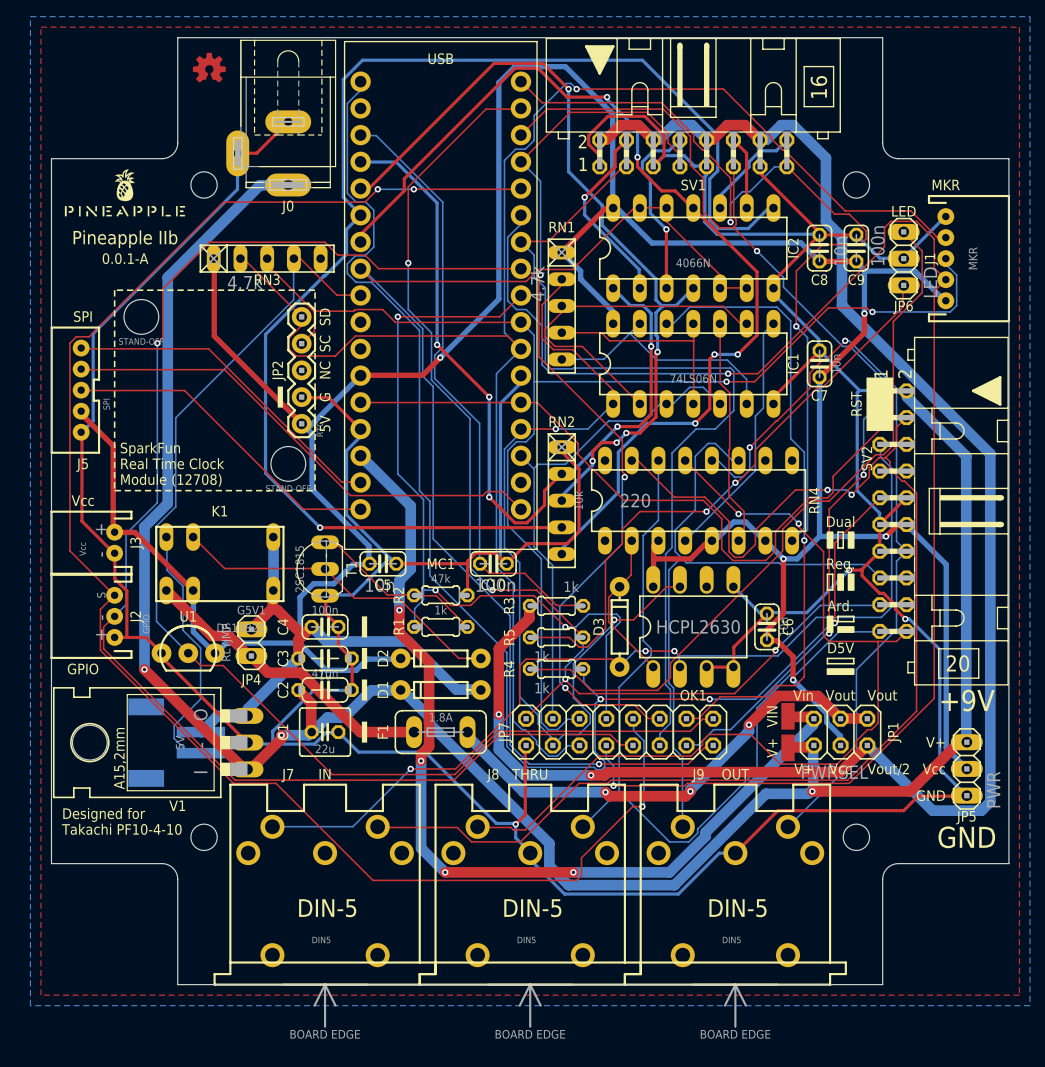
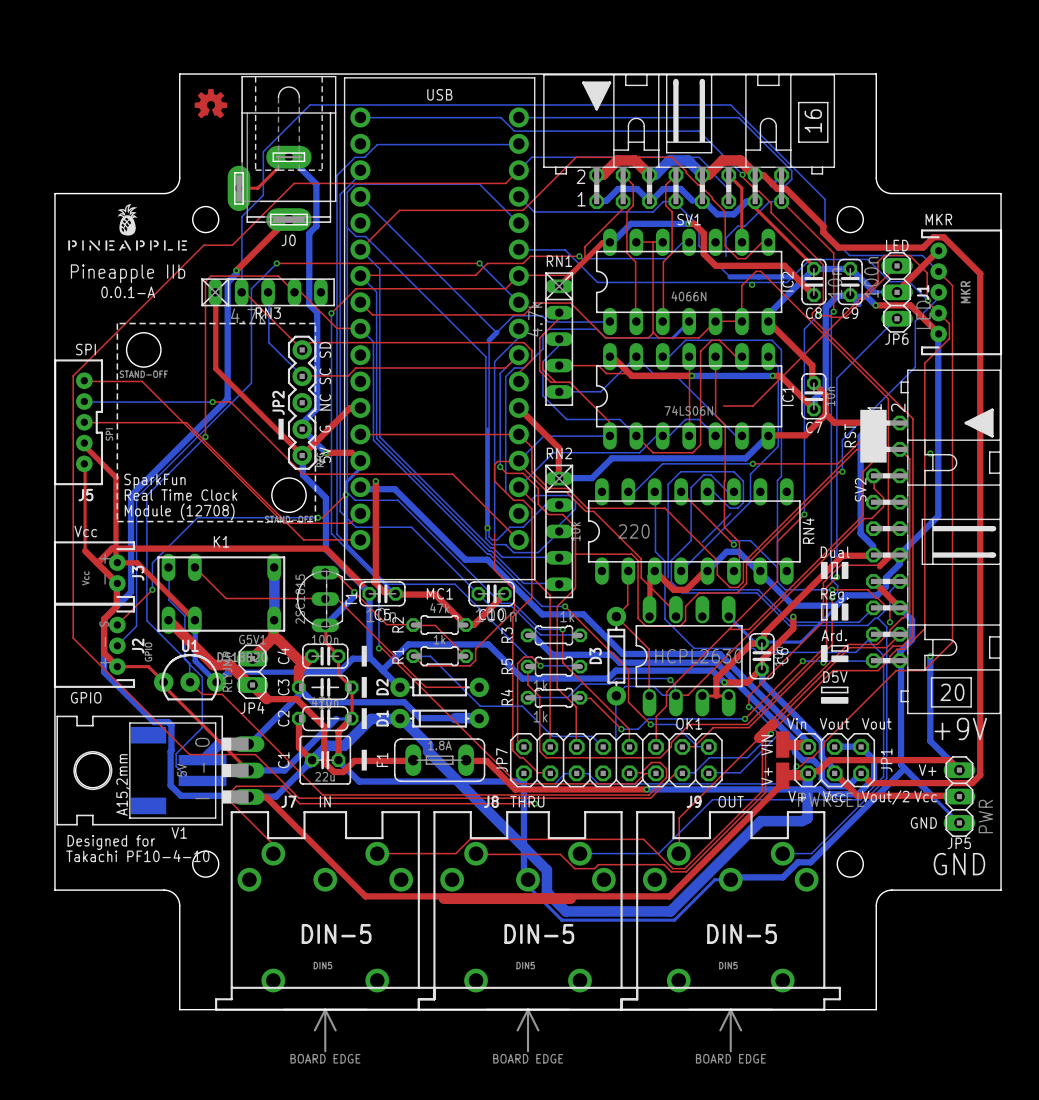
bottom zone outline: (30, 16) (30, 1005) (1029, 1005) (1029, 16) (30, 16) -> none
top zone outline: (40, 27) (40, 995) (1019, 995) (1019, 27) (40, 27) -> none
bottom track: (360, 81) (360, 90) (347, 103) (347, 157) -> (518, 223) (479, 184) (355, 184) (347, 192)
bottom track: none -> (360, 117) (500, 117) (514, 131) (699, 131) (742, 174)
top track: (520, 81) (542, 102) (661, 102) (693, 134) (693, 141) -> none
bottom track: none -> (518, 117) (738, 117) (791, 170) (791, 179) (782, 188) (781, 201)
top track: (568, 89) (542, 63) (494, 63) (368, 188) (360, 188) -> none
bottom track: (568, 89) (568, 171) (602, 205) (602, 225) (656, 279) (656, 299) (662, 306) -> none
via: (568, 89) -> none
top track: (576, 89) (723, 89) (845, 210) (910, 210) (937, 237) (945, 237) -> (796, 766) (800, 766) (809, 757) (812, 757) (824, 745) (824, 742) (896, 670) (924, 670) (952, 642) (952, 285) (938, 271)
bottom track: (576, 89) (571, 83) (566, 83) (534, 115) (534, 140) (525, 149) (515, 149) (504, 160) (504, 332) (520, 348) (496, 373) -> (518, 328) (518, 337) (494, 361) (494, 406)
via: (576, 89) -> none
top track: (607, 97) (567, 97) (538, 68) (514, 68) (404, 178) (404, 190) (360, 234) (360, 241) -> (579, 256) (530, 256) (523, 263) (487, 263) (475, 275) (360, 275)
bottom track: (607, 97) (607, 99) (637, 129) (637, 157) -> none
via: (607, 97) -> none
top track: (520, 108) (486, 109) (408, 186) (408, 263) -> none
bottom track: none -> (288, 157) (316, 184) (316, 226) (309, 233) (309, 304) (317, 312) (317, 408) (303, 421) (302, 429) (325, 452)
top track: (676, 121) (663, 109) (546, 109) (520, 135) -> (672, 157) (576, 157) (523, 210) (399, 210) (360, 249)
bottom track: (360, 135) (376, 135) (442, 202) (442, 347) (434, 355) (434, 378) (479, 423) (479, 563) -> (360, 170) (359, 174) (340, 194) (340, 511) (356, 527) (411, 527) (478, 593)
bottom track: none -> (518, 170) (531, 157) (699, 157) (728, 188) (728, 201)
top track: (690, 137) (690, 165) (703, 178) (703, 211) (719, 227) (732, 227) (736, 224) (736, 219) (733, 217) (733, 166) -> (686, 173) (689, 176)
top track: none -> (742, 174) (742, 177) (756, 191) (759, 191) (771, 203) (771, 212) (823, 265) (823, 302) (812, 313) (812, 318) (912, 418) (912, 635) (902, 646) (893, 646) (878, 660) (873, 660)
via: none -> (742, 174)
top track: (626, 140) (615, 151) (615, 166) (584, 197) -> (623, 175) (633, 185) (633, 205) (626, 211) (626, 253) (635, 261) (636, 321)
bottom track: (679, 140) (668, 150) (653, 150) (642, 162) (642, 171) (650, 179) (650, 213) (666, 229) -> none
bottom track: (760, 140) (766, 139) (781, 125) (793, 125) (825, 158) (825, 221) (842, 237) (842, 305) (990, 453) (990, 801) (981, 810) (932, 810) (867, 745) -> (527, 635) (533, 635) (552, 654) (611, 654) (619, 662) (716, 662) (794, 741) (794, 752) (802, 760) (813, 760) (821, 768) (821, 779) (828, 786) (847, 786) (861, 773)
bottom track: (776, 150) (760, 150) (749, 162) (749, 166) (720, 195) (720, 207) -> none
bottom track: (237, 153) (237, 189) (93, 333) (93, 420) (81, 432) -> none
top track: (637, 157) (637, 166) (661, 190) (675, 190) (757, 271) (757, 335) (737, 354) -> none
via: (637, 157) -> none
top track: (520, 161) (570, 112) (647, 112) (668, 133) (668, 142) (679, 154) (679, 166) -> none
bottom track: (360, 162) (396, 162) (437, 202) (437, 344) -> (360, 196) (496, 332)
top track: (599, 166) (599, 154) (588, 144) (588, 135) (607, 116) (644, 116) (664, 135) (664, 155) (653, 166) -> none
top track: (626, 166) (623, 166) (548, 241) -> (622, 201) (622, 208) (584, 246) (584, 258) (568, 275) (546, 275)
bottom track: (696, 166) (694, 166) (684, 155) (664, 155) (653, 166) -> (692, 200) (680, 188) (663, 188) (649, 201) (637, 188) (618, 188) (606, 200) (596, 201)
bottom track: (706, 166) (704, 222) (716, 234) (819, 234) -> (702, 201) (717, 214) (733, 214) (746, 201) (755, 201)
bottom track: (536, 177) (540, 181) (540, 275) -> none
top track: (729, 177) (730, 222) -> (725, 211) (725, 246) (737, 258) (745, 258) (761, 242) (768, 242)
top track: none -> (288, 219) (236, 270)
bottom track: (288, 184) (259, 185) (167, 277) (167, 503) (144, 526) -> (205, 436) (146, 495) (146, 557)
top track: (520, 188) (413, 189) -> none
top track: (377, 189) (364, 202) (223, 202) (89, 336) (76, 336) -> (518, 170) (505, 183) (294, 183) (232, 245) (203, 245) (79, 369)
bottom track: (377, 189) (413, 189) -> none
via: (377, 189) -> none
via: (413, 189) -> none
bottom track: none -> (688, 223) (630, 223) (612, 242) (609, 242)
via: none -> (688, 223)
bottom track: (584, 197) (584, 214) (639, 269) (639, 288) -> none
via position: (584, 197) -> (579, 256)
top track: (639, 208) (633, 208) (572, 269) -> (653, 332) (648, 337) (605, 337) (569, 303)
top track: (666, 208) (667, 222) (720, 275) (720, 288) -> (653, 242) (653, 332) (658, 337) (699, 337) (715, 321)
bottom track: none -> (689, 242) (682, 242) (666, 258) (581, 258) (579, 256)
bottom track: (773, 208) (768, 208) (748, 228) (718, 228) (709, 219) (709, 178) (717, 170) (717, 135) (642, 60) (362, 60) (343, 79) (343, 197) (360, 215) (346, 229) (346, 254) (265, 334) (265, 473) (320, 527) -> none
bottom track: (373, 210) (373, 247) (364, 255) (355, 255) (347, 263) -> (347, 227) (347, 297)
bottom track: none -> (373, 244) (485, 356) (485, 538) (492, 544) (505, 544) (513, 552) (538, 552) (559, 531)
top track: (834, 214) (849, 214) (866, 230) (866, 239) (860, 244) (822, 244) (796, 271) (796, 326) -> (828, 248) (833, 253) (833, 311)
bottom track: none -> (360, 249) (379, 268) (379, 436) (490, 547) (502, 557) (559, 557)
bottom track: (520, 215) (520, 224) (507, 237) (507, 300) (516, 309) (526, 309) (542, 325) (542, 364) (550, 373) (728, 373) -> (518, 249) (565, 249) (597, 282) (786, 282) (809, 259) (867, 259) (889, 281) (908, 281) (927, 300)
top track: none -> (938, 250) (897, 292)
bottom track: (945, 216) (903, 258) -> none
via: (730, 222) -> none
top track: (733, 227) (757, 251) -> none
top track: none -> (276, 263) (479, 263)
via: none -> (276, 263)
bottom track: none -> (479, 263) (518, 302)
via: none -> (479, 263)
top track: (666, 229) (666, 288) -> (675, 175) (665, 185) (665, 205) (672, 211) (672, 253) (663, 261) (662, 321)
via: (666, 229) -> none
top track: (903, 231) (922, 251) (922, 292) (893, 321) (893, 445) (883, 454) (875, 454) (829, 501) (810, 501) (782, 529) -> (897, 265) (845, 317) (817, 315)
top track: (856, 234) (819, 234) (773, 280) (773, 288) -> (825, 414) (825, 394) (812, 380) (812, 365) (768, 321)
bottom track: (856, 234) (880, 258) -> (768, 321) (768, 314) (813, 268) (850, 268) (874, 291)
via: none -> (236, 270)
bottom track: none -> (938, 271) (922, 255) (849, 255) (824, 230) (824, 199) (730, 104) (310, 104) (263, 151) (263, 195) (241, 216) (241, 292)
top track: (277, 242) (324, 242) (337, 255) (356, 255) -> (278, 276) (294, 292)
bottom track: (520, 242) (534, 255) (534, 276) (545, 287) (545, 301) -> none
bottom track: (734, 243) (651, 243) (617, 208) (613, 208) (612, 113) (565, 66) (514, 66) (498, 82) (498, 299) -> (729, 276) (699, 246) (699, 226) (675, 201) (663, 201) (653, 211) (534, 211)
top track: (203, 247) (162, 288) (162, 337) (157, 343) -> (205, 281) (205, 436)
bottom track: (757, 251) (783, 277) (783, 287) (842, 346) (850, 346) (890, 386) (890, 395) (863, 419) (863, 474) -> none
bottom track: (561, 252) (580, 271) (580, 279) (612, 311) (613, 323) -> none
top track: none -> (356, 288) (331, 313)
top track: (364, 255) (378, 268) (520, 268) -> (364, 288) (505, 288) (518, 275)
top track: (267, 258) (267, 265) (314, 311) (314, 331) (302, 343) -> none
bottom track: none -> (268, 292) (268, 342) (302, 376)
bottom track: (293, 258) (293, 299) (175, 417) (175, 506) -> (317, 517) (197, 517) (177, 537)
bottom track: (945, 258) (946, 264) (956, 275) (956, 305) (950, 311) (872, 311) -> (938, 292) (938, 298) (915, 321) (915, 367) (842, 440) (842, 471)
top track: (819, 261) (856, 261) -> (813, 295) (784, 265) (715, 265) (703, 253) (703, 233) (694, 223) (688, 223)
bottom track: (408, 263) (408, 309) (431, 332) (431, 380) (469, 418) (469, 567) -> (518, 143) (377, 144) (364, 157) (355, 157) (337, 175) (337, 534) (386, 584) (455, 584) (468, 597)
via: (408, 263) -> none
via: none -> (927, 300)
bottom track: (360, 268) (422, 328) (422, 376) (433, 386) (433, 538) (510, 615) (510, 744) (529, 764) (599, 764) -> none
top track: none -> (875, 305) (910, 305) (938, 333)
via: none -> (875, 305)
bottom track: (347, 273) (356, 282) (371, 282) (419, 330) (419, 490) (429, 501) (429, 575) (506, 652) (506, 746) (527, 767) (594, 767) (596, 769) (601, 769) (604, 766) (604, 761) (595, 752) (595, 704) (600, 699) (583, 682) (583, 668) -> (347, 307) (347, 492) (355, 500) (398, 500) (494, 596)
top track: (540, 275) (538, 276) (538, 356) (622, 440) (622, 471) (624, 477) -> none
via: (540, 275) -> none
bottom track: none -> (833, 311) (831, 314) (831, 579) (837, 585) (837, 592) (832, 597)
via: none -> (833, 311)
bottom track: none -> (331, 313) (331, 533) (378, 581) (378, 648)
via: none -> (331, 313)
top track: (945, 279) (934, 291) (934, 698) (849, 783) (687, 783) (684, 785) (613, 785) -> (938, 313) (949, 323) (949, 338) (924, 363) (924, 628) (904, 649) (897, 649) (878, 670)
bottom track: none -> (817, 315) (804, 329) (804, 514)
via: none -> (817, 315)
top track: (903, 285) (902, 307) (822, 387) (817, 387) (755, 449) (755, 464) (735, 482) -> none
bottom track: none -> (897, 318) (836, 378) (836, 577)
bottom track: (613, 288) (630, 305) (643, 305) (651, 313) (651, 346) -> (609, 321) (548, 322) (542, 315) (513, 315) (497, 332)
bottom track: (773, 288) (773, 294) (818, 339) (818, 349) (859, 390) (857, 392) (857, 490) (879, 513) (879, 515) -> (873, 423) (860, 436) (860, 533) (873, 546)
bottom track: none -> (360, 328) (373, 341) (373, 440) (542, 606) (565, 606)
top track: (520, 295) (499, 316) (397, 316) -> none
bottom track: (945, 300) (914, 271) (865, 271) (864, 313) -> none
bottom track: (676, 304) (663, 305) (656, 312) (657, 352) -> (672, 337) (605, 337) (596, 329) (548, 329) (542, 334)
bottom track: (490, 307) (440, 357) -> (489, 340) (489, 536) (492, 539) (497, 539) (509, 527) (523, 527) (545, 505) (559, 505)
top track: (724, 307) (561, 305) (561, 312) (545, 328) -> (719, 340) (711, 340) (700, 351) (700, 444) (692, 452) (653, 452) (636, 435)
top track: (355, 309) (353, 311) (314, 311) -> (355, 342) (310, 342) (302, 349)
top track: (382, 309) (395, 322) (520, 322) -> (382, 342) (523, 342) (531, 350) (531, 360) (519, 372) (518, 381)
top track: (872, 311) (866, 307) (828, 307) (754, 381) (726, 381) -> none
via: (872, 311) -> none
top track: (864, 313) (864, 332) (819, 377) -> (772, 375) (780, 375) (813, 409)
via: (864, 313) -> none
bottom track: (545, 315) (545, 328) -> (559, 339) (558, 345) (542, 361)
bottom track: none -> (542, 348) (523, 368) (514, 368) (505, 376) (505, 482)
top track: (301, 316) (301, 325) (288, 338) (288, 348) (296, 356) (335, 356) (348, 343) -> (302, 375) (348, 375)
bottom track: (397, 316) (397, 473) (423, 499) (423, 599) (414, 608) (414, 626) -> none
via: (397, 316) -> none
bottom track: (786, 316) (790, 320) (790, 438) (804, 452) (804, 528) (792, 540) -> (781, 349) (781, 476) (777, 480) (777, 562) (786, 571)
bottom track: (520, 322) (534, 335) (534, 433) (526, 441) (516, 441) (507, 450) -> (518, 355) (500, 373) (500, 467)
top track: none -> (609, 356) (612, 356) (631, 375) (691, 375)
bottom track: (773, 323) (763, 333) (763, 408) (755, 416) (755, 442) -> (768, 356) (778, 366) (778, 446) (750, 474)
bottom track: (796, 326) (807, 337) (807, 530) (804, 533) (804, 540) -> none
via: (796, 326) -> none
bottom track: (629, 333) (656, 360) (727, 360) (746, 379) (746, 403) -> (636, 356) (653, 373) (673, 373) (735, 435) (741, 435)
top track: (355, 336) (507, 336) (520, 348) -> (355, 368) (505, 368) (518, 355)
top track: (845, 340) (809, 372) (809, 388) (749, 447) -> none
bottom track: (845, 340) (849, 340) (896, 388) (896, 541) (906, 551) -> none
via: (845, 340) -> none
bottom track: (157, 343) (157, 502) (126, 534) (126, 604) -> (276, 263) (251, 288) (251, 383) (136, 497) (136, 626) (128, 634)
via: (157, 343) -> none
bottom track: none -> (691, 375) (772, 375)
via: none -> (691, 375)
via: none -> (772, 375)
top track: (437, 344) (489, 396) -> none
via: (437, 344) -> none
top track: (554, 346) (582, 346) (639, 403) -> (552, 379) (555, 382)
top track: (651, 346) (651, 414) (639, 426) (617, 426) -> none
via: (651, 346) -> none
top track: (139, 348) (208, 348) (229, 369) -> (226, 402) (230, 402)
top track: (819, 350) (773, 396) (773, 403) -> (825, 414) (805, 435) (768, 435)
top track: (657, 352) (656, 353) (656, 416) (639, 433) (626, 433) -> none
via: (657, 352) -> none
top track: (714, 354) (709, 359) (709, 408) (695, 423) -> none
bottom track: (714, 354) (737, 354) -> none
via: (714, 354) -> none
via: (737, 354) -> none
top track: (440, 357) (422, 375) (360, 375) -> (302, 455) (349, 408) (360, 407)
via: (440, 357) -> none
bottom track: (550, 368) (730, 368) (733, 371) (733, 410) (715, 429) (696, 429) (684, 440) -> (548, 401) (566, 419) (619, 419) (636, 435)
top track: (81, 369) (211, 369) -> none
bottom track: none -> (84, 401) (212, 402)
via: none -> (212, 402)
top track: (224, 369) (350, 495) (482, 495) (486, 491) (502, 491) -> (302, 474) (452, 474) (500, 522)
via: (728, 373) -> none
bottom track: (360, 375) (308, 427) (301, 423) -> none
bottom track: (520, 375) (520, 383) (500, 403) (500, 558) (506, 563) -> none
bottom track: (819, 377) (819, 536) -> (813, 409) (814, 398) (825, 387) (825, 307) (837, 295) (850, 295) (866, 296) (875, 305)
bottom track: (534, 381) (726, 381) -> none
via: (726, 381) -> none
top track: none -> (825, 414) (834, 422) (873, 423)
bottom track: (906, 391) (906, 396) (966, 456) (966, 741) -> (930, 656) (930, 741) (958, 769)
via: (489, 396) -> none
top track: (301, 397) (328, 397) (352, 420) -> (325, 452) (352, 452)
top track: (521, 402) (537, 402) (578, 443) (578, 454) (623, 500) (703, 500) (721, 518) (721, 530) -> (519, 434) (531, 447) (531, 471) (548, 488) (567, 488) (587, 508) (664, 508) (717, 560)
bottom track: none -> (768, 435) (745, 458) (611, 458) (592, 478) (559, 478)
via: none -> (205, 436)
bottom track: (612, 404) (587, 429) (555, 429) -> (609, 436) (543, 436) (518, 460)
top track: none -> (879, 437) (863, 437) (837, 463) (752, 463)
top track: (906, 417) (896, 427) (896, 446) (885, 457) (878, 457) (869, 467) -> (863, 471) (863, 498)
via: none -> (325, 452)
bottom track: (608, 420) (565, 464) -> (605, 452) (553, 452) (518, 487)
via: none -> (930, 453)
bottom track: (695, 423) (647, 423) (618, 452) (618, 492) (562, 548) (561, 554) -> (360, 275) (376, 291) (376, 438) (523, 583) (559, 584)
via: (695, 423) -> none
bottom track: (302, 424) (312, 433) (312, 489) (368, 546) (369, 563) (352, 564) (333, 583) (313, 583) (300, 597) (299, 643) (326, 670) (356, 670) (367, 659) (400, 658) -> (302, 455) (302, 474) (325, 497) (325, 549) (369, 593) (369, 657)
bottom track: (617, 426) (571, 473) (561, 473) -> none
via: (617, 426) -> none
bottom track: (520, 429) (520, 433) (504, 449) (504, 547) (519, 562) (519, 696) (538, 715) (538, 724) (555, 741) (552, 745) (563, 734) (579, 734) (590, 723) (590, 714) (573, 697) (573, 663) (614, 623) (614, 619) -> none
top track: (555, 429) (520, 429) -> none
via: (555, 429) -> none
bottom track: none -> (752, 463) (662, 463) (634, 491) (628, 491)
bottom track: (626, 433) (616, 442) -> none
via: (626, 433) -> none
via: none -> (500, 467)
via: none -> (842, 471)
top track: (869, 440) (833, 476) (833, 492) (827, 497) (809, 497) (775, 531) (775, 550) (765, 560) (732, 560) (721, 549) (721, 544) -> none
top track: (302, 442) (341, 481) (360, 482) -> (142, 381) (283, 523) (350, 523) (360, 513)
top track: (616, 442) (601, 442) (592, 451) (592, 461) -> none
via: (616, 442) -> none
bottom track: (879, 444) (880, 457) (891, 468) (891, 607) (881, 617) (816, 617) (777, 655) (679, 655) -> none
top track: (561, 447) (562, 452) (579, 469) (579, 531) (567, 543) (526, 543) (506, 563) (495, 553) (475, 553) (467, 561) (467, 594) -> (559, 478) (558, 448) (518, 407)
bottom track: (749, 447) (748, 471) -> (680, 471) (733, 471) (743, 481) (743, 502)
via position: (749, 447) -> (752, 463)
top track: none -> (375, 481) (375, 579) (374, 581) (384, 592) (393, 592) (396, 594) (435, 594) (466, 625) (474, 624) (504, 593)
via: none -> (375, 481)
top track: none -> (518, 487) (535, 503) (535, 580) (550, 595) (550, 746)
bottom track: (520, 455) (534, 469) (534, 546) (552, 565) (552, 718) -> none
bottom track: (362, 457) (410, 505) (410, 569) (399, 580) (399, 610) -> (362, 489) (394, 489) (465, 559) (487, 559) (542, 614) (583, 614) (622, 653) (719, 653) (807, 741) (808, 746)
top track: (885, 457) (890, 461) (890, 466) -> (873, 475) (874, 488) (883, 497)
top track: (631, 460) (638, 461) (674, 497) (704, 497) (728, 521) (728, 551) -> (717, 574) (724, 581)
bottom track: (658, 460) (658, 520) (643, 535) (643, 640) (651, 648) (651, 655) (619, 687) -> (616, 695) (615, 715)
bottom track: (507, 461) (507, 525) (541, 558) (541, 722) (548, 729) (557, 729) (567, 719) (579, 718) -> none
bottom track: (592, 461) (592, 465) (562, 495) -> (562, 495) (569, 495) (575, 501) (575, 509) (559, 526)
via: (592, 461) -> none
top track: none -> (345, 494) (322, 517) (317, 517)
via: none -> (345, 494)
top track: (890, 469) (916, 493) -> (899, 449) (909, 459) (909, 524)
top track: none -> (883, 500) (883, 506) (871, 518) (864, 518) (687, 695) (675, 695)
top track: (561, 473) (544, 490) (544, 505) (526, 522) (514, 522) (489, 497) -> none
top track: (863, 474) (829, 509) (829, 552) -> (741, 321) (741, 285) (756, 271) (760, 271) (888, 398) (888, 554) (877, 565) (840, 565) (823, 582)
via: (863, 474) -> none
bottom track: (624, 477) (622, 479) (622, 543) (559, 606) (559, 682) (565, 687) -> none
via: (624, 477) -> none
top track: (869, 477) (851, 494) -> (863, 508) (863, 515) (748, 629) (729, 629)
via: (735, 482) -> none
top track: none -> (804, 514) (777, 541) (777, 559)
via: none -> (317, 517)
top track: (795, 489) (827, 489) -> (790, 520) (839, 471) (842, 471)
bottom track: (827, 489) (846, 489) (851, 494) -> none
via position: (827, 489) -> (804, 514)
via: (851, 494) -> none
top track: (879, 497) (834, 542) (834, 623) -> none
top track: (906, 497) (879, 524) -> none
top track: none -> (494, 534) (494, 570) (514, 589) (514, 610) (475, 649) (475, 660) (470, 665) (423, 665) (413, 656)
bottom track: (496, 503) (496, 566) -> none
bottom track: none -> (729, 540) (750, 540) (777, 567) (777, 581) (785, 589) (832, 589)
top track: (706, 511) (639, 511) (622, 529) (622, 543) (605, 560) (605, 628) (587, 647) (579, 647) -> (629, 746) (629, 729) (576, 676)
via: (706, 511) -> none
bottom track: (738, 514) (789, 514) (798, 523) -> none
top track: (81, 520) (114, 553) (114, 578) (126, 590) (126, 637) -> (85, 550) (117, 583) (116, 606) (104, 619) (104, 653) (117, 666)
top track: none -> (575, 554) (631, 554) (638, 560) (638, 618) (645, 626) (680, 626) (685, 620) (685, 606) (699, 592) (737, 592) (746, 583) (746, 564) (750, 560)
top track: (798, 523) (798, 526) (823, 551) (823, 635) (829, 641) (838, 641) -> (771, 733) (832, 670)
via: (798, 523) -> none
bottom track: (906, 524) (946, 564) (946, 748) (966, 768) -> none
top track: (879, 525) (879, 551) (861, 570) -> (873, 555) (842, 555) (763, 634) (761, 643)
bottom track width: thick (144, 526) (144, 590) -> thin (146, 557) (146, 620)
bottom track: (156, 526) (156, 621) (187, 652) -> (158, 556) (152, 562) (152, 589)
via: (320, 527) -> none
top track: (561, 527) (320, 527) -> none
top track: (755, 530) (755, 544) (748, 551) -> (873, 449) (856, 449) (743, 562) (743, 581)
top track: none -> (97, 563) (112, 548) (325, 548) (361, 584)
bottom track: (819, 536) (797, 558) (783, 558) (745, 522) (733, 522) (715, 540) (712, 540) -> (938, 333) (938, 516) (899, 555) (899, 564) (885, 577) (885, 586) (877, 595) (846, 595) (836, 605) (793, 605) (760, 571) (757, 570) (738, 551) (726, 551) (707, 571)
bottom track: (819, 536) (886, 536) -> none
via: (886, 536) -> none
top track: (804, 540) (804, 676) (795, 685) (777, 685) (765, 696) (720, 696) (717, 699) -> (832, 597) (832, 644) (748, 727) (713, 727)
via: (804, 540) -> none
top track: (708, 541) (690, 558) (653, 558) -> (704, 571) (686, 589) (673, 589) (654, 571)
top track: none -> (836, 577) (826, 587) (826, 645) (747, 724) (689, 724) (671, 742) (671, 746) (660, 757) (546, 757) (539, 751) (539, 696) (527, 684) (527, 666)
via: none -> (836, 577)
bottom track: (672, 547) (665, 554) (665, 684) (670, 689) (670, 723) (660, 733) (659, 745) -> none
top track: (69, 550) (114, 595) (100, 609) (100, 650) (233, 783) (275, 783) (372, 880) (576, 880) (581, 875) (581, 857) (597, 841) -> (73, 581) (73, 638) (189, 754) (255, 754) (298, 798) (650, 798) (675, 773) (682, 773)
top track: none -> (873, 581) (899, 607)
bottom track: (681, 557) (668, 570) -> (654, 491) (655, 551) (664, 561) (664, 600)
bottom track: (389, 558) (352, 594) (325, 594) -> (354, 592) (354, 596) (325, 624)
top track: (783, 558) (783, 613) (767, 630) -> (793, 616) (793, 628) (762, 659)
via: (783, 558) -> none
top track: none -> (152, 589) (117, 625)
via: none -> (152, 589)
bottom track: none -> (679, 589) (758, 589) (790, 622) (859, 622) (873, 607)
top track: none -> (832, 589) (867, 589) (889, 610) (889, 622)
via: none -> (832, 589)
via: none -> (354, 592)
bottom track: (761, 562) (866, 564) (879, 577) -> (756, 592) (789, 625) (867, 625) (889, 605)
top track: (467, 563) (396, 563) -> none
top track: (480, 563) (489, 573) (524, 573) (556, 605) (583, 605) -> none
bottom track: none -> (478, 593) (490, 606) (512, 606) (540, 634) (580, 635)
via: none -> (832, 597)
top track: (325, 569) (354, 598) (398, 598) (458, 658) -> (325, 599) (337, 599) (425, 687) (457, 687)
top track: (849, 570) (861, 570) -> none
via: (849, 570) -> none
top track: (861, 570) (862, 575) (879, 593) (883, 593) (895, 605) (895, 609) (905, 619) -> none
bottom track: (502, 573) (513, 583) (513, 720) (536, 740) (536, 744) (548, 756) (557, 756) -> (500, 603) (513, 603) (539, 629) (562, 629)
bottom track: (896, 575) (896, 592) -> none
top track: none -> (565, 606) (628, 669) (628, 702) (650, 724)
via: none -> (565, 606)
top track: (916, 582) (916, 711) (847, 780) (611, 780) (607, 783) (579, 783) (520, 841) (471, 841) (457, 827) (377, 826) -> (909, 611) (877, 644) (847, 644) (762, 730) (762, 791) (684, 868) (672, 868) (643, 839) (470, 839) (455, 853) (377, 853)
top track: (619, 586) (608, 597) (608, 622) (652, 666) -> (616, 616) (649, 649) (649, 695)
top track: (679, 586) (666, 586) (633, 619) (614, 619) -> (675, 616) (675, 611) (641, 577) (641, 558) (593, 511) (585, 511) (565, 491) (546, 491) (519, 463) (518, 460) (497, 461) (494, 464) (494, 481) (513, 500) (523, 500) (531, 509) (531, 597) (512, 616) (512, 750) (538, 772) (550, 773)
via: none -> (793, 616)
bottom track: (668, 589) (668, 683) (673, 687) (673, 748) (682, 756) (682, 826) -> none
bottom track: (144, 590) (144, 669) -> (146, 620) (189, 663) (189, 681)
bottom track: (423, 590) (435, 590) -> none
top track: (435, 590) (450, 605) (470, 605) (480, 595) (534, 595) (565, 627) -> none
via: (435, 590) -> none
top track: (492, 590) (536, 590) (583, 637) -> none
via: (492, 590) -> none
top track: (829, 591) (829, 633) -> (823, 621) (748, 695) (748, 707)
via: none -> (889, 622)
bottom track: (896, 594) (896, 629) (856, 669) (856, 758) (788, 826) -> (877, 617) (886, 627) (886, 778) (811, 853) (783, 853)
via: none -> (562, 629)
top track: (529, 605) (529, 618) (498, 648) (498, 714) -> none
bottom track: (879, 605) (820, 605) (775, 650) -> (873, 634) (855, 652) (828, 652)
top track: (399, 610) (399, 632) (429, 662) (429, 746) (421, 754) (421, 760) -> none
via position: (399, 610) -> (378, 648)
top track: (766, 614) (733, 647) (733, 666) -> (761, 643) (751, 643) (716, 678) (716, 695)
top track: (114, 616) (103, 627) (103, 648) (228, 773) -> (535, 803) (299, 803) (282, 786) (236, 786) (230, 792) (230, 801)
top track: none -> (378, 648) (382, 648) (517, 783) (596, 783)
via: (614, 619) -> none
bottom track: (905, 619) (909, 619) (939, 649) (939, 768) -> (899, 607) (912, 619) (912, 639) (900, 651) (901, 764) (932, 796)
via: (905, 619) -> none
bottom track: (831, 623) (755, 699) (709, 699) -> (825, 652) (757, 652) (753, 648) (694, 648) (664, 619)
via: (834, 623) -> none
bottom track: (311, 626) (326, 641) (408, 641) (456, 689) -> (248, 744) (300, 693) (298, 687) (313, 702) (404, 702) (420, 718) (455, 718)
bottom track: none -> (369, 657) (400, 687)
bottom track: none -> (369, 657) (352, 658) (339, 672) (299, 672)
bottom track: (565, 627) (575, 627) (588, 614) (616, 614) (619, 617) (619, 622) (606, 635) (606, 718) -> (413, 656) (430, 656) (480, 706) (522, 706) (552, 736) (592, 736) (603, 746)
via: (565, 627) -> none
via: none -> (930, 656)
top track: none -> (802, 661) (744, 718)
via: none -> (802, 661)
bottom track: (838, 631) (796, 674) (790, 674) (757, 708) (757, 769) (697, 829) (697, 833) (688, 841) (669, 841) (618, 790) -> (832, 661) (802, 661)
top track: (906, 631) (896, 641) (884, 641) -> none
bottom track: (829, 633) (826, 633) (730, 729) -> (771, 733) (747, 757) (725, 757)
via: none -> (540, 665)
top track: (530, 637) (569, 637) -> (562, 629) (562, 662) (566, 666)
bottom track: (583, 637) (583, 649) (565, 667) (565, 679) -> (580, 666) (540, 665) (531, 657) (527, 657) (490, 619)
top track: none -> (762, 669) (747, 682) (724, 682)
top track: (766, 640) (777, 640) (793, 656) (793, 679) -> none
bottom track: none -> (382, 670) (408, 644) (488, 644) (522, 678) (607, 678) (615, 670) (712, 670) (724, 682)
top track: (878, 641) (878, 723) (871, 729) (867, 729) (856, 740) (856, 744) (837, 764) (780, 764) (750, 734) (708, 734) (702, 740) (702, 744) (691, 756) (638, 756) -> (655, 773) (645, 773) (634, 783)
bottom track: none -> (672, 678) (615, 678) (610, 684) (580, 684) (567, 697) (527, 697)
top track: (775, 650) (775, 652) (734, 693) (579, 693) (565, 679) (526, 718) -> none
via: (775, 650) -> none
top track: (645, 651) (674, 651) -> none
bottom track: (645, 651) (635, 651) (628, 657) -> (675, 695) (662, 695) (653, 686) (625, 686)
via: (645, 651) -> none
via: none -> (724, 682)
bottom track: (298, 658) (247, 708) (247, 715) -> none
top track: (220, 665) (223, 665) (332, 774) (454, 774) (498, 731) (690, 731) (702, 719) (713, 718) -> (222, 694) (322, 794) (649, 794) (666, 777) (666, 768) (660, 762) (651, 762) (641, 772) (629, 773)
top track: (519, 665) (526, 659) (611, 659) (619, 666) -> (517, 694) (517, 663) (523, 657) (531, 657) (540, 665)
top track: (529, 668) (570, 669) -> (500, 467) (506, 473) (523, 473) (538, 488) (538, 504) (548, 514) (562, 514) (575, 527) (575, 588) (557, 606) (557, 688) (567, 698)
top track: none -> (580, 697) (590, 698) (621, 729)
top track: (144, 669) (242, 767) (251, 768) (281, 738) (281, 735) -> none
via: (144, 669) -> none
top track: (265, 670) (267, 672) (300, 672) (360, 732) (413, 732) -> (266, 699) (296, 699) (324, 726) (324, 762) (333, 772) (343, 772) (354, 760) (413, 760)
top track: (579, 678) (591, 690) (657, 690) (660, 687) -> (576, 707) (576, 746)
bottom track: none -> (748, 707) (752, 707) (776, 731) (776, 736) (740, 772) (708, 773)
via: none -> (748, 707)
via: (565, 679) -> none
bottom track: (793, 679) (826, 713) (826, 722) (840, 736) (840, 741) -> (761, 669) (762, 682) (821, 741) (821, 756) (834, 769)
via: (793, 679) -> none
top track: none -> (352, 715) (351, 718) (338, 731) (338, 760)
top track: (565, 687) (582, 704) (634, 704) (647, 718) (659, 718) -> (656, 716) (655, 746)
via: (565, 687) -> none
top track: (298, 690) (311, 703) (311, 732) -> (298, 718) (298, 747) (312, 760)
bottom track: (336, 690) (313, 690) (272, 731) (272, 744) -> (336, 718) (284, 770) (248, 770)
bottom track: none -> (744, 718) (648, 718) (638, 729) (621, 729)
via: none -> (744, 718)
bottom track: none -> (650, 724) (675, 724) (697, 746) (708, 746)
via: none -> (650, 724)
top track: (777, 695) (817, 695) (840, 718) (867, 718) -> (772, 724) (849, 647) (886, 647) (899, 634)
top track: (600, 699) (709, 699) -> none
via position: (600, 699) -> (621, 729)
via: (709, 699) -> none
top track: (519, 704) (455, 768) (410, 768) -> (517, 733) (517, 741) (523, 746)
via: none -> (771, 733)
top track width: thick (764, 709) (749, 724) -> thin (759, 737) (744, 753)
bottom track: (498, 714) (498, 749) (524, 775) (591, 775) -> none
via: (498, 714) -> none
bottom track: (633, 718) (633, 730) (643, 740) (643, 805) (642, 806) -> none
bottom track: (813, 718) (813, 724) (705, 832) (705, 836) (669, 872) (573, 872) -> none
bottom track: none -> (834, 746) (861, 746) (874, 760) (874, 778) (858, 794) (824, 794) (820, 789) (646, 789)
bottom track: (619, 720) (619, 790) (583, 826) -> (868, 640) (883, 655) (883, 776) (860, 799) (712, 799) (658, 853) (580, 853)
top track: none -> (744, 753) (679, 817) (678, 853)
bottom track: (749, 724) (749, 731) (690, 791) -> none
via: (749, 724) -> none
bottom track: none -> (338, 760) (359, 781) (523, 781)
top track: none -> (466, 760) (486, 760) (515, 789) (646, 789)
bottom track: (467, 732) (467, 736) (523, 792) (605, 792) -> none
bottom track: (281, 735) (308, 735) -> (236, 270) (236, 273) (227, 282) (227, 398) (131, 495) (131, 592) (104, 619) (104, 672) (154, 722) (168, 722) (171, 725) (170, 785) (180, 795) (276, 796) (309, 763)
via: (281, 735) -> none
bottom track: none -> (796, 766) (779, 783) (598, 783) (588, 773) (576, 773)
via: none -> (796, 766)
bottom track: none -> (904, 768) (810, 862) (798, 862) (783, 877) (733, 877) (730, 879)
bottom track: (247, 742) (314, 744) (325, 732) (338, 732) (358, 752) (425, 752) (496, 823) (514, 823) (515, 837) (526, 848) -> (523, 773) (523, 874)
top track: (966, 742) (959, 742) (910, 791) (812, 791) -> (959, 770) (949, 760) (829, 760) (818, 771) (810, 771) (808, 773)
top track: (526, 745) (525, 814) (515, 824) -> none
bottom track: (606, 745) (606, 758) (613, 765) (613, 785) -> none
top track: (633, 745) (620, 744) (610, 734) (499, 734) (453, 780) (235, 780) -> (273, 853) (272, 844) (236, 807)
top track: (713, 745) (706, 745) (688, 764) (599, 764) -> none
top track: none -> (834, 773) (857, 795) (959, 796)
top track: (867, 745) (840, 772) (607, 772) (604, 775) (591, 775) -> (861, 773) (870, 783) (972, 783) (980, 775) (980, 273) (943, 237) (933, 237) (923, 247) (838, 247) (823, 232) (823, 226) (786, 188) (777, 188) (763, 175) (755, 175)
top track: none -> (782, 775) (781, 784) (669, 896) (365, 896) (266, 797) (248, 796)
top track: (599, 756) (525, 829) (513, 829) (510, 827) -> (594, 868) (574, 868) (560, 854) (508, 854)
bottom track: (421, 760) (421, 848) (445, 872) -> none
via: (421, 760) -> none
via: none -> (646, 789)
via: (599, 764) -> none
bottom track: (410, 768) (352, 826) (272, 826) -> none
via: (410, 768) -> none
via: (591, 775) -> none
via: none -> (535, 803)
via: (613, 785) -> none
top track: (690, 791) (685, 796) (609, 796) (605, 792) -> none
via: (690, 791) -> none
via: (812, 791) -> none
via: (605, 792) -> none
top track: (966, 795) (918, 796) (903, 810) (777, 810) (735, 853) -> none
top track: (642, 806) (632, 806) (601, 837) -> (765, 731) (765, 792) (686, 871) (671, 871) (664, 864) (598, 864)
via: (642, 806) -> none
via: (515, 824) -> none
via: (445, 872) -> none
via: (573, 872) -> none

